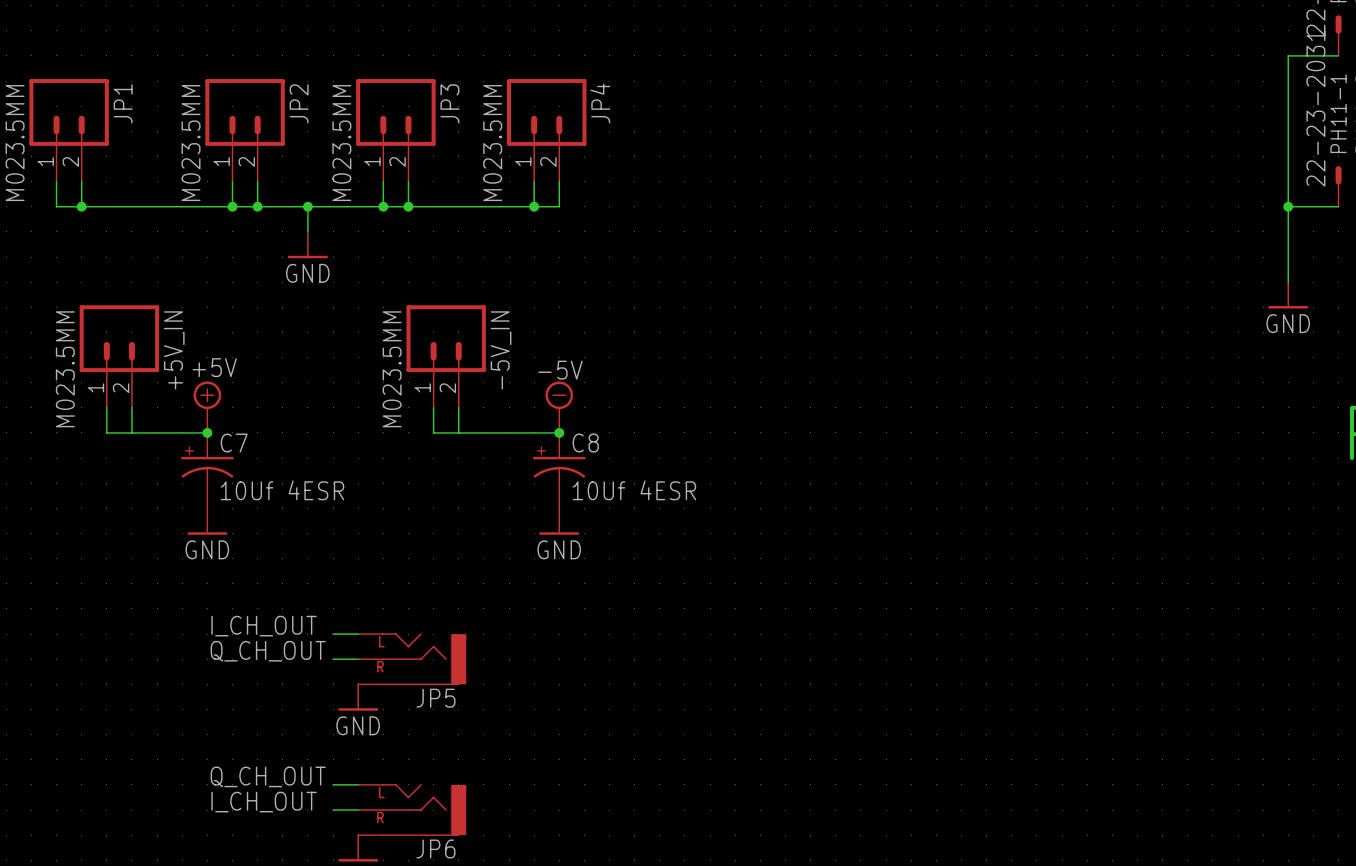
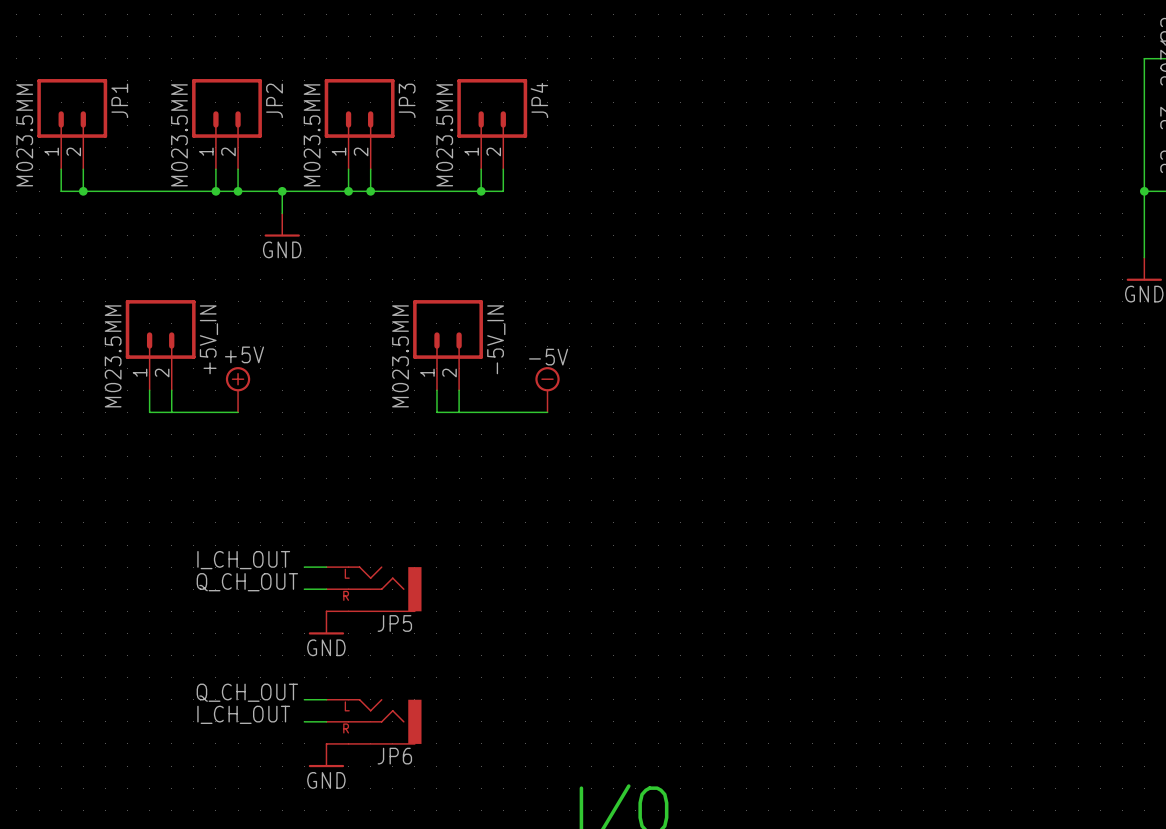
+5V_IN position: (119, 356) -> (160, 345)
-5V_IN position: (446, 356) -> (448, 345)
wire: (106, 407) (106, 432) (207, 432) -> (149, 390) (149, 412) (238, 412)
wire: (131, 407) (131, 432) -> (171, 390) (171, 412)
power symbol position: +5V (207, 407) -> +5V (238, 389)
wire: (433, 407) (433, 432) (559, 432) -> (436, 390) (436, 412) (547, 412)
wire: (458, 407) (458, 432) -> (459, 390) (459, 412)
power symbol position: -5V (559, 407) -> -5V (547, 389)
junction: (207, 432) -> none
junction: (559, 432) -> none
C7: 10Uf 4ESR (207, 470) -> none
C8: 10Uf 4ESR (559, 470) -> none
power symbol: GND (207, 521) -> none
power symbol: GND (559, 521) -> none

